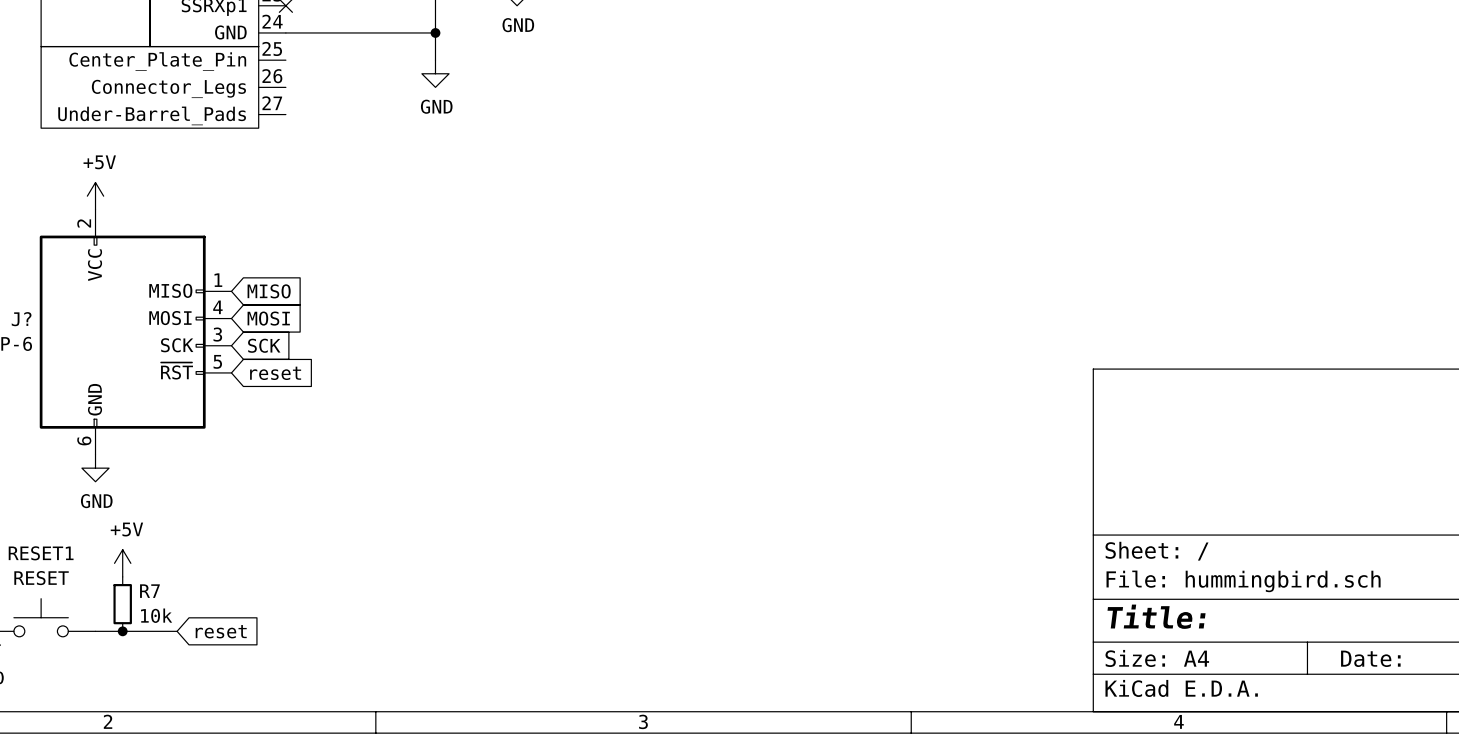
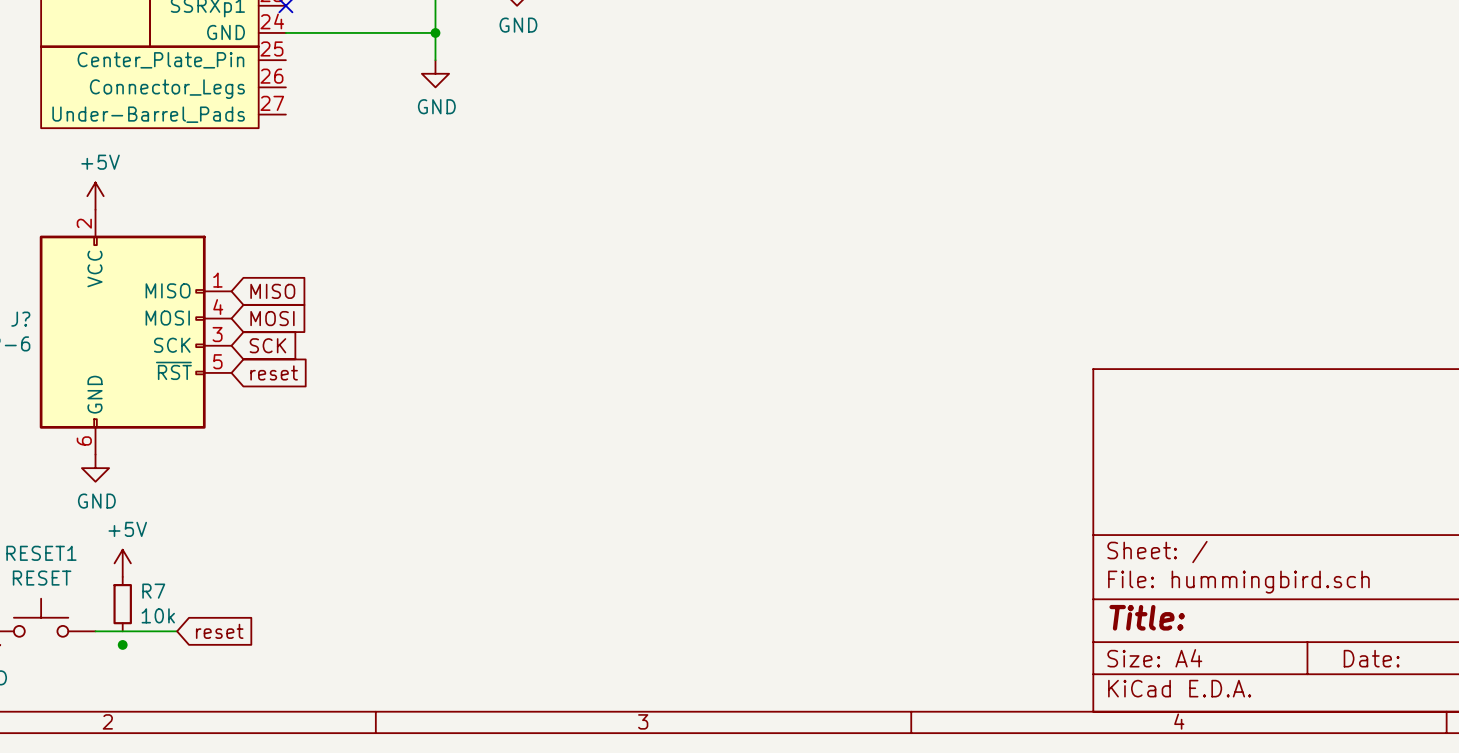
junction position: (122, 631) -> (122, 644)

